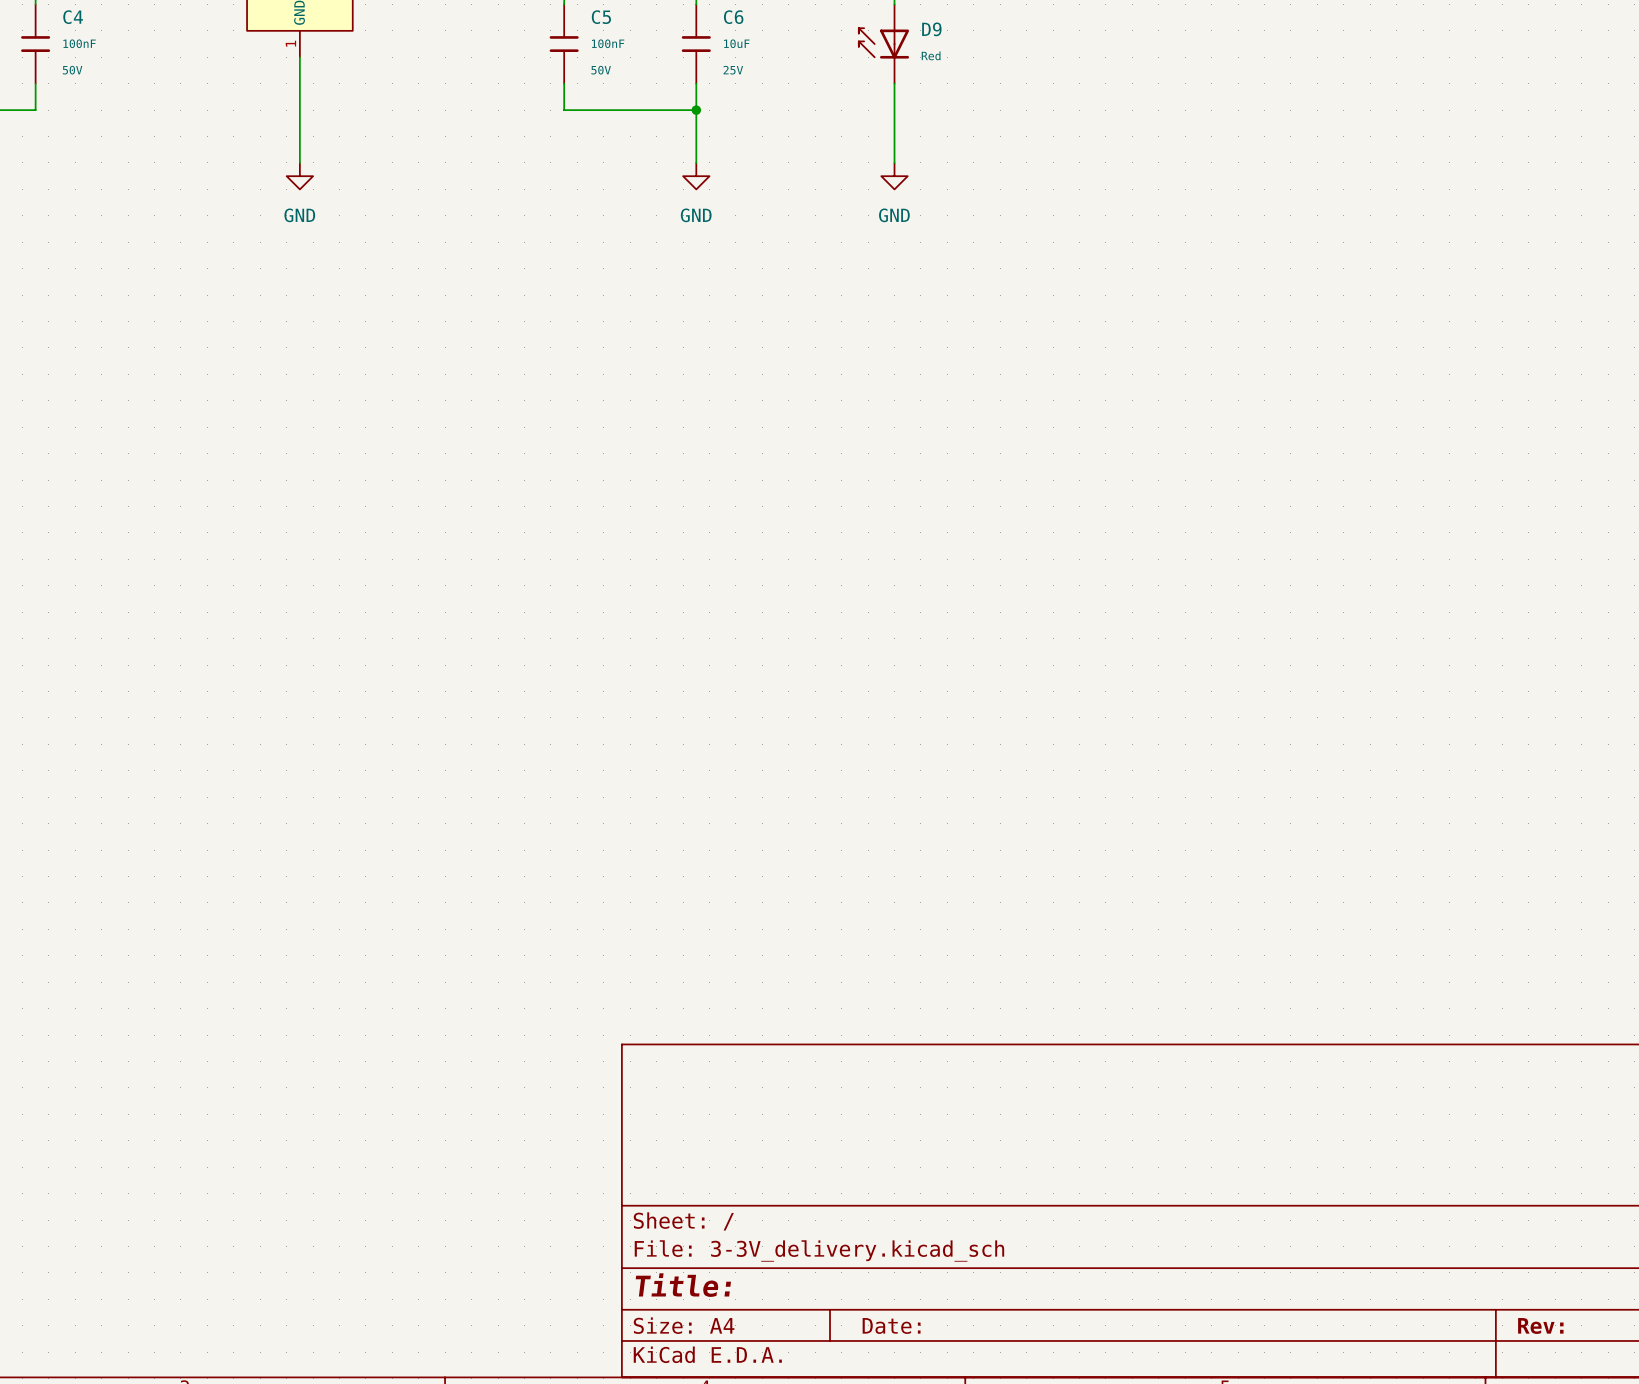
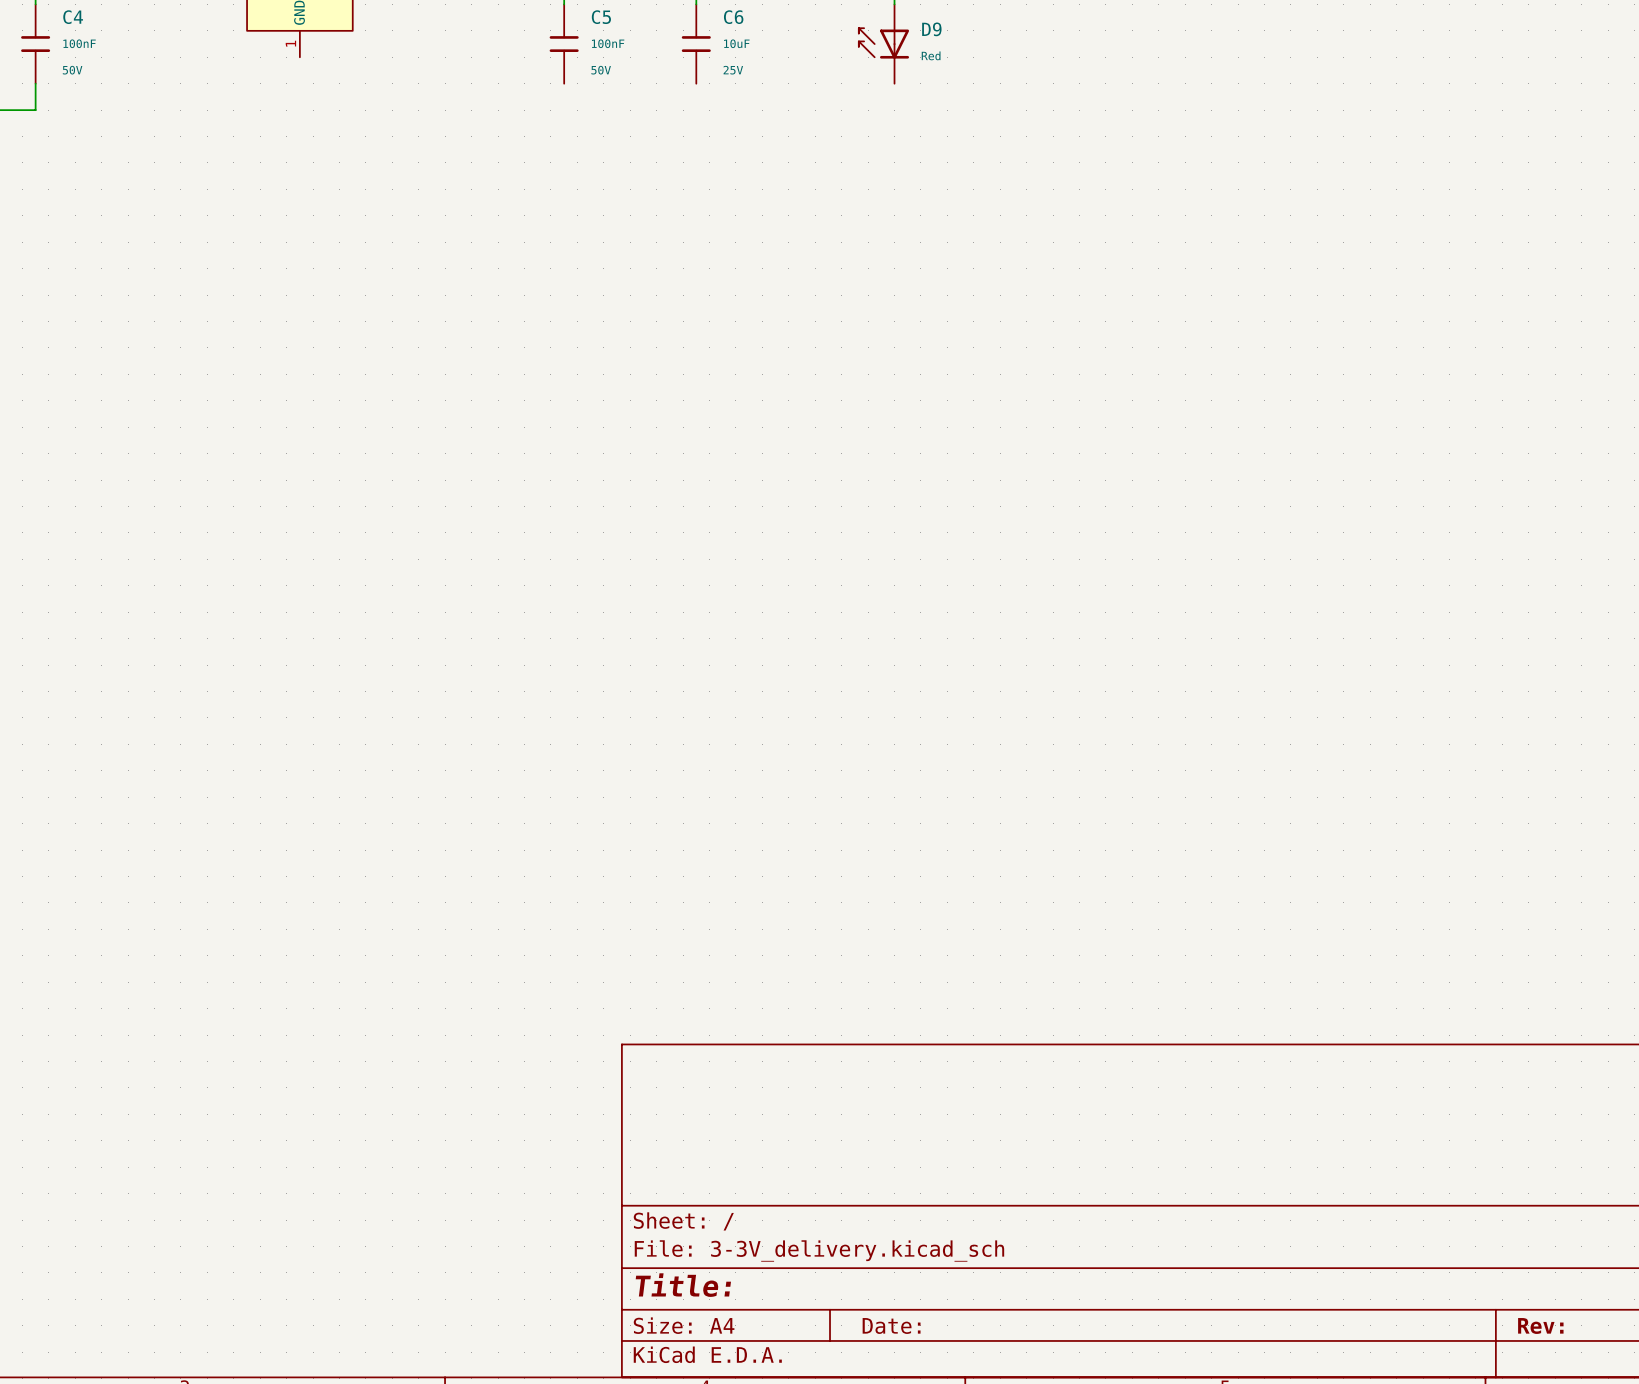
wire: (299, 57) (299, 162) -> none
wire: (564, 83) (564, 110) (696, 110) -> none
wire: (696, 83) (696, 162) -> none
wire: (894, 83) (894, 162) -> none
junction: (696, 110) -> none
power symbol: GND (299, 176) -> none
power symbol: GND (696, 176) -> none
power symbol: GND (894, 176) -> none

